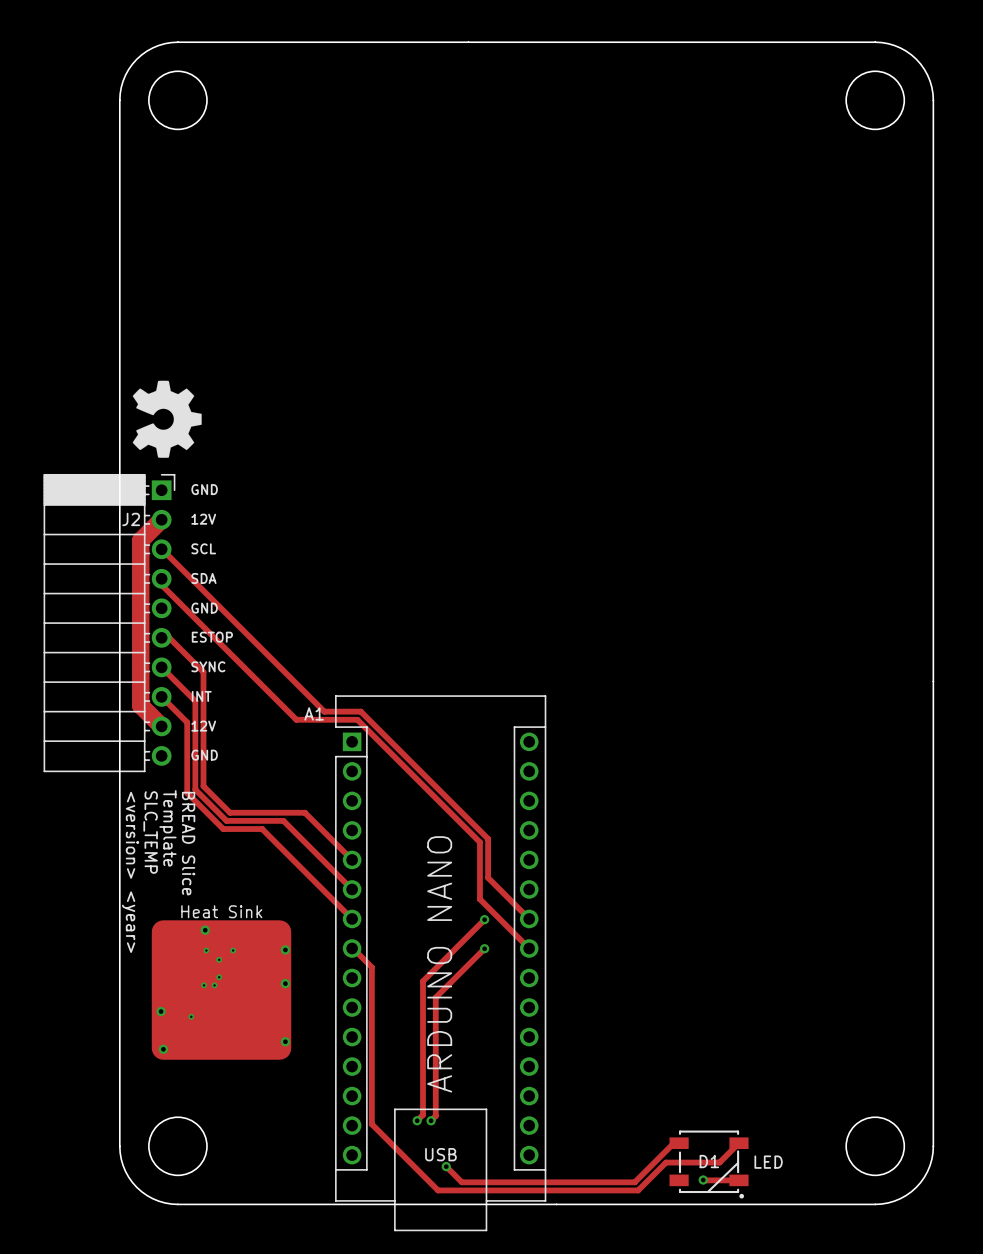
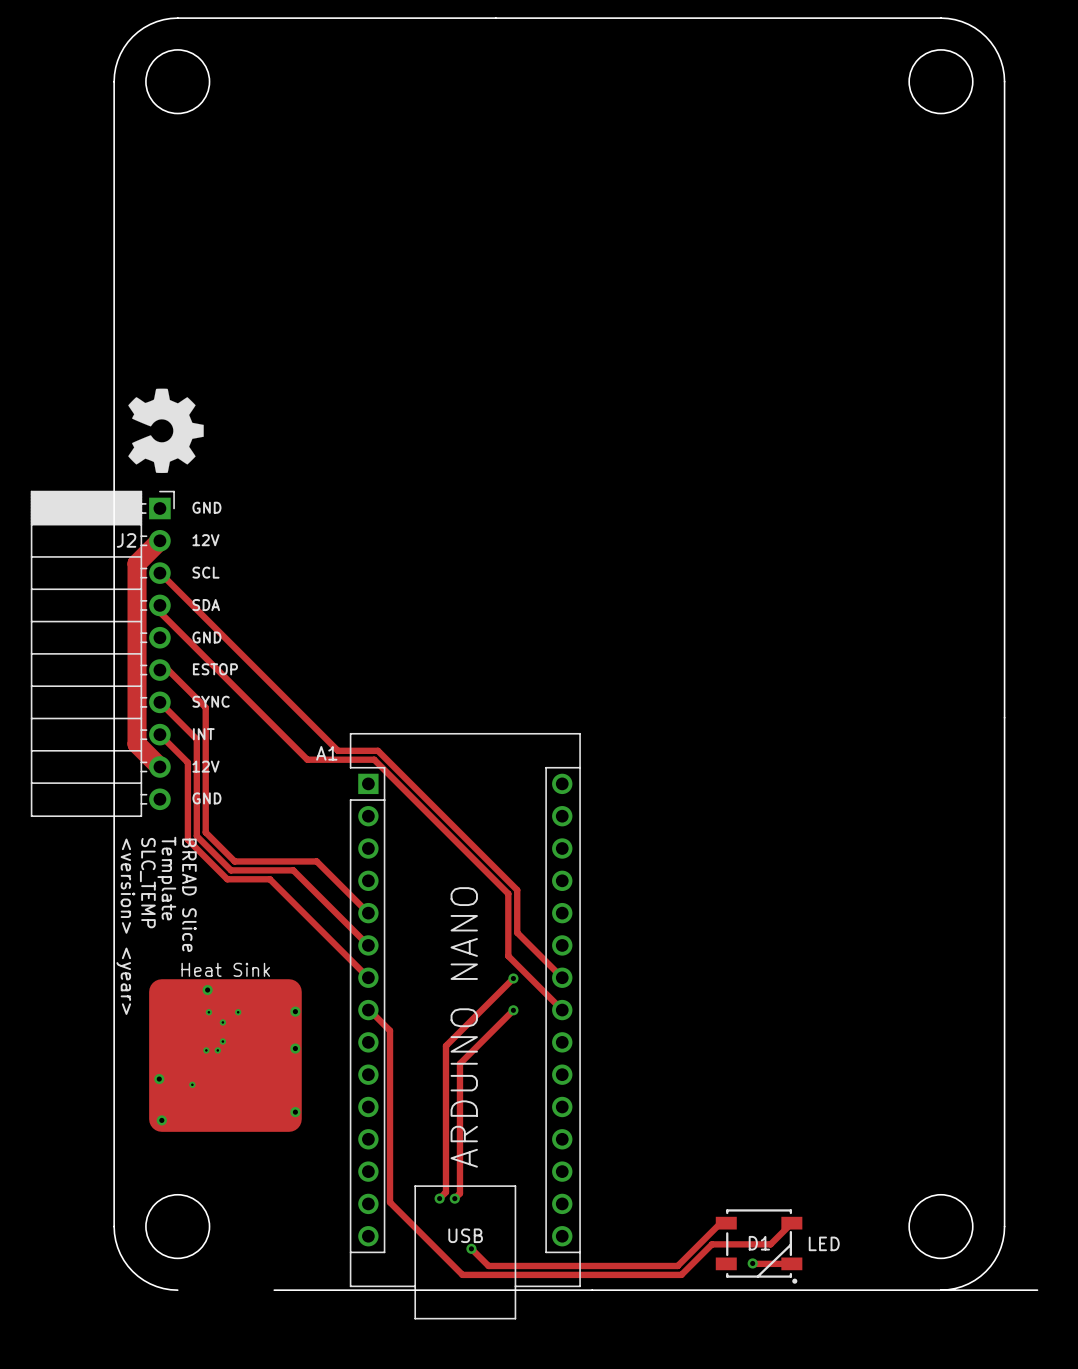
board edge: (177, 1204) (266, 1204) -> none
board edge: none -> (940, 1290) (1037, 1290)

